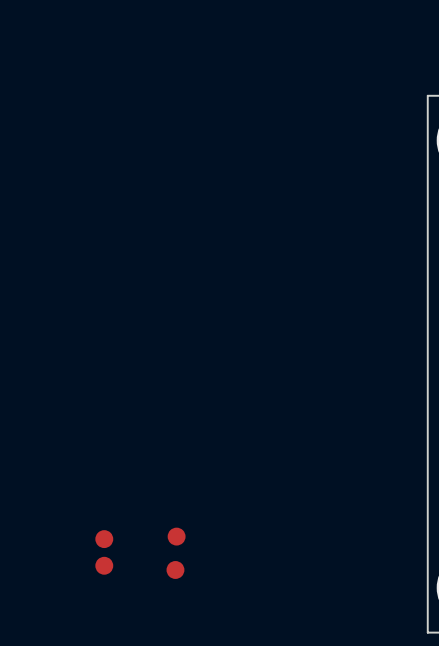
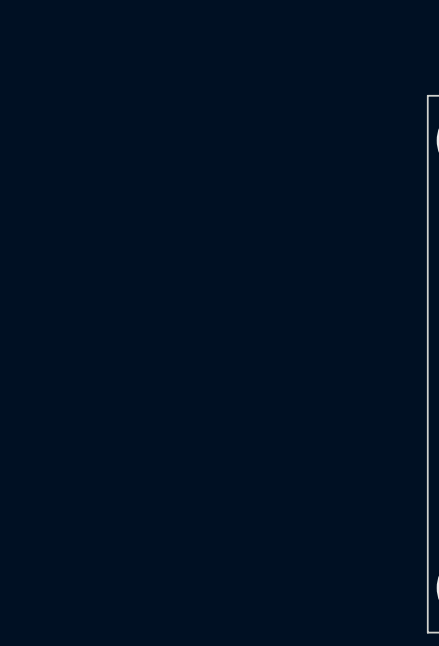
part: (176, 536) -> none
part: (104, 539) -> none
part: (104, 565) -> none
part: (175, 569) -> none

